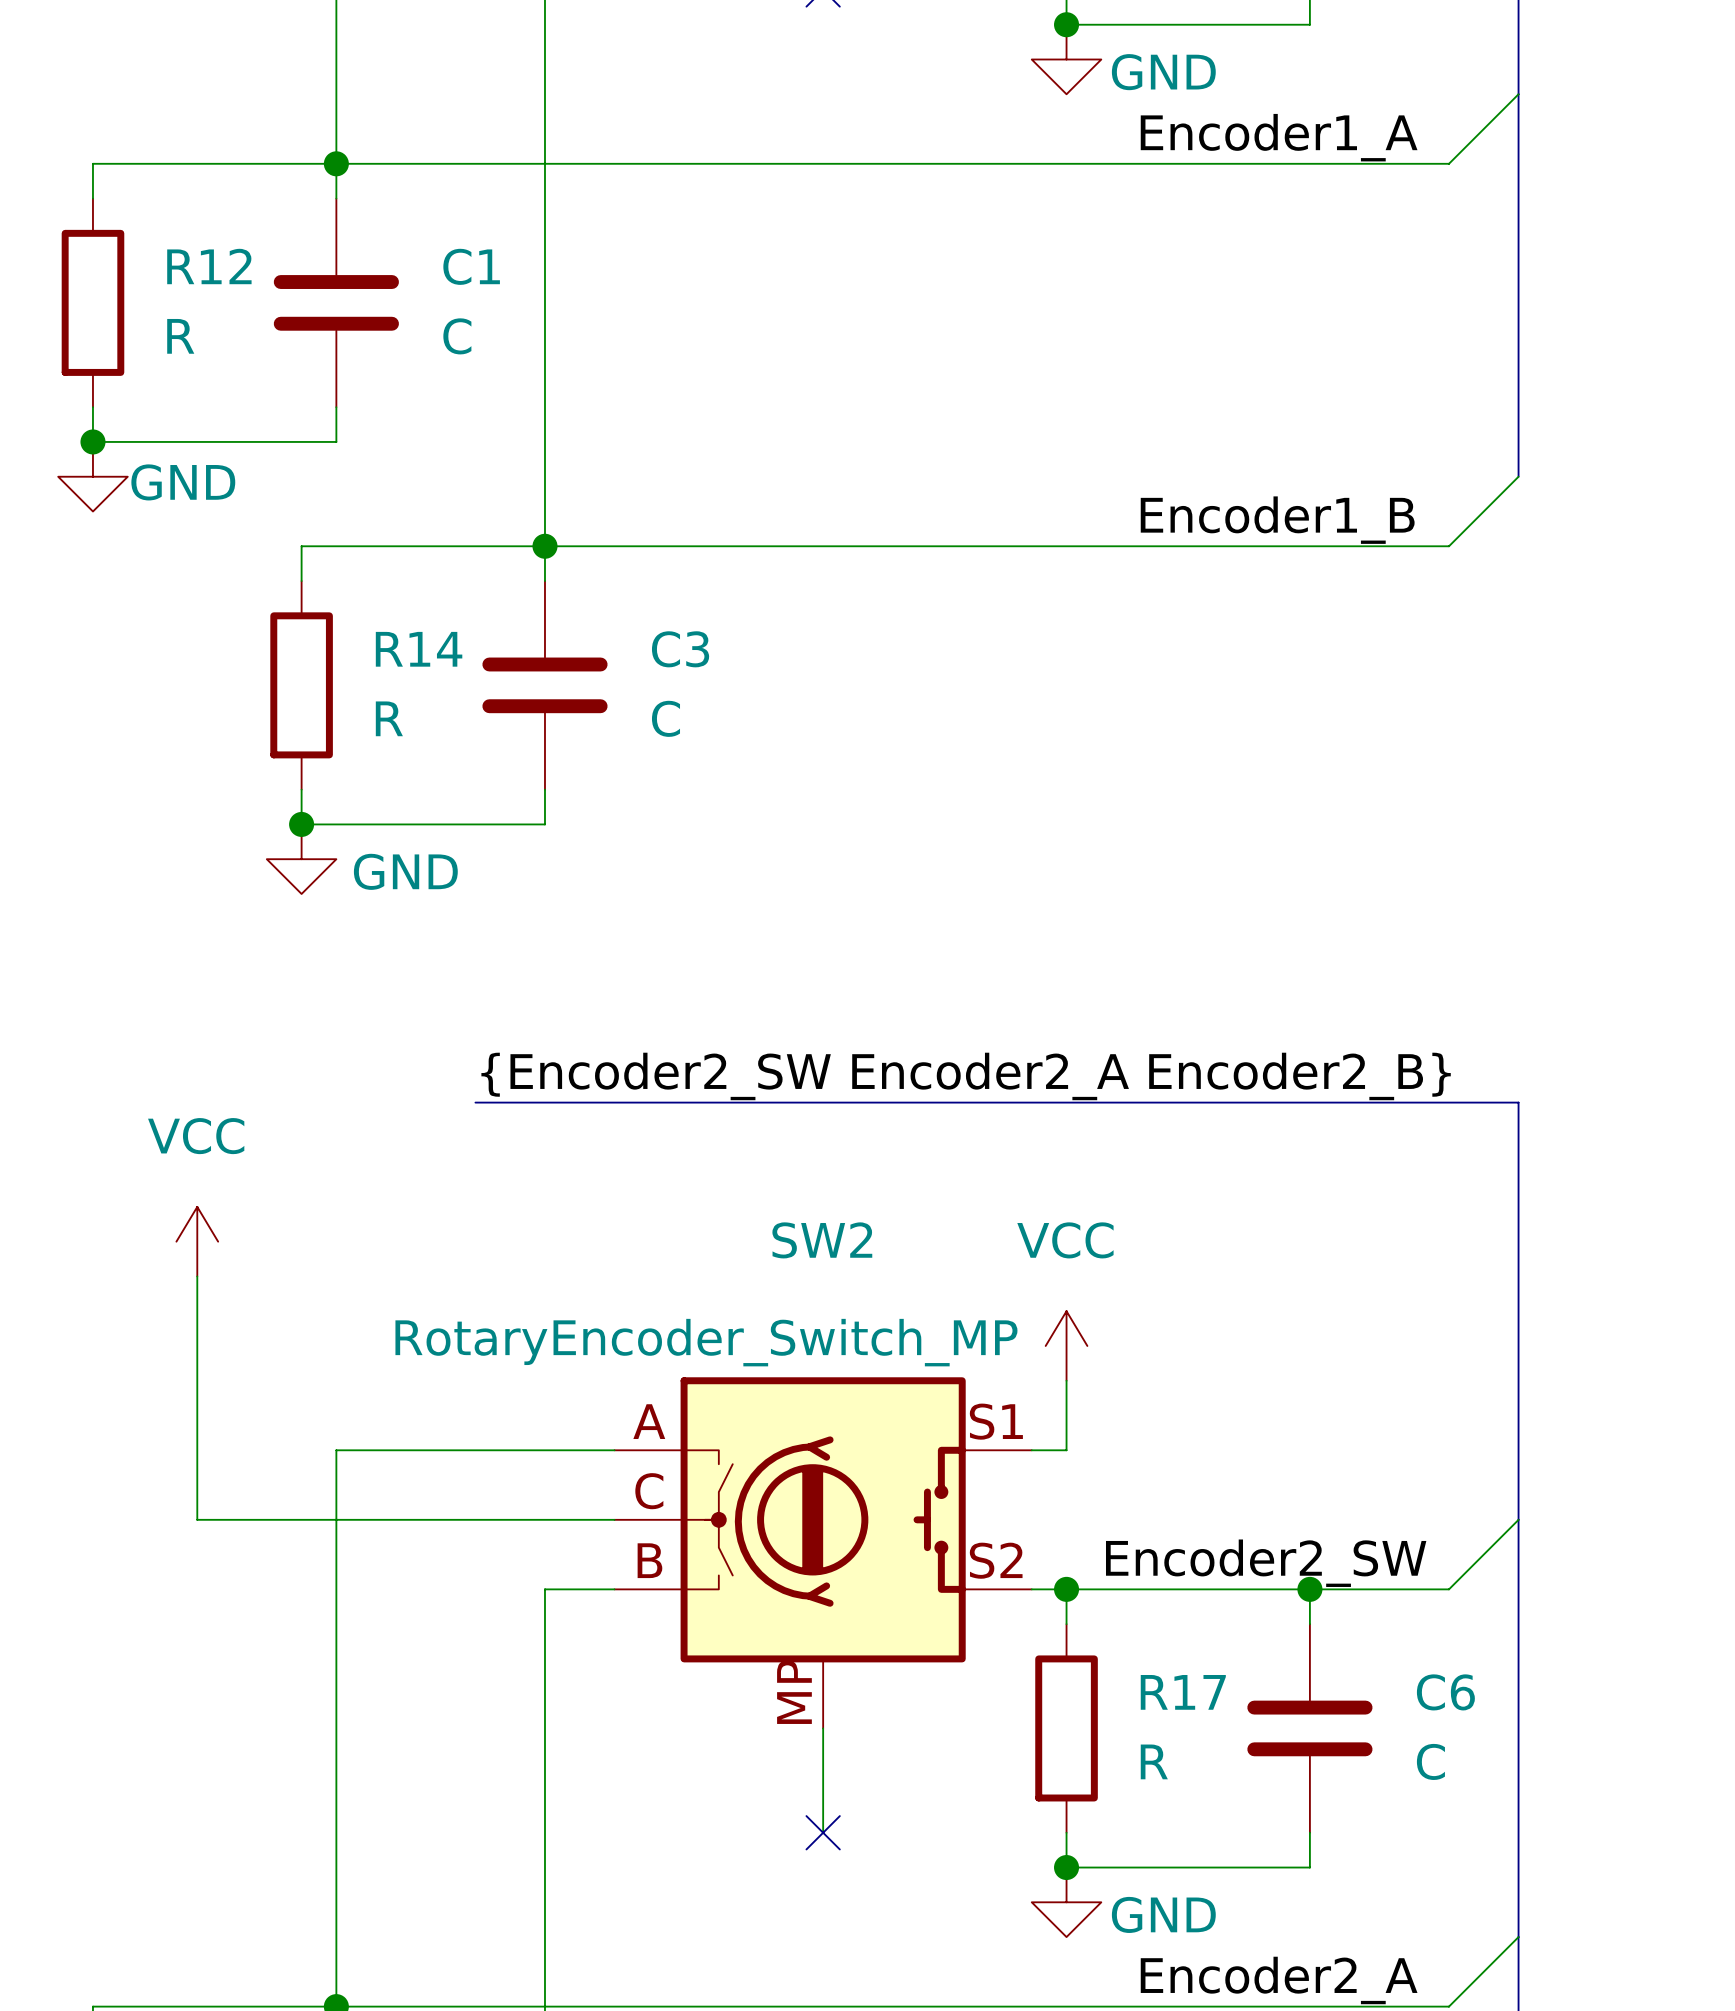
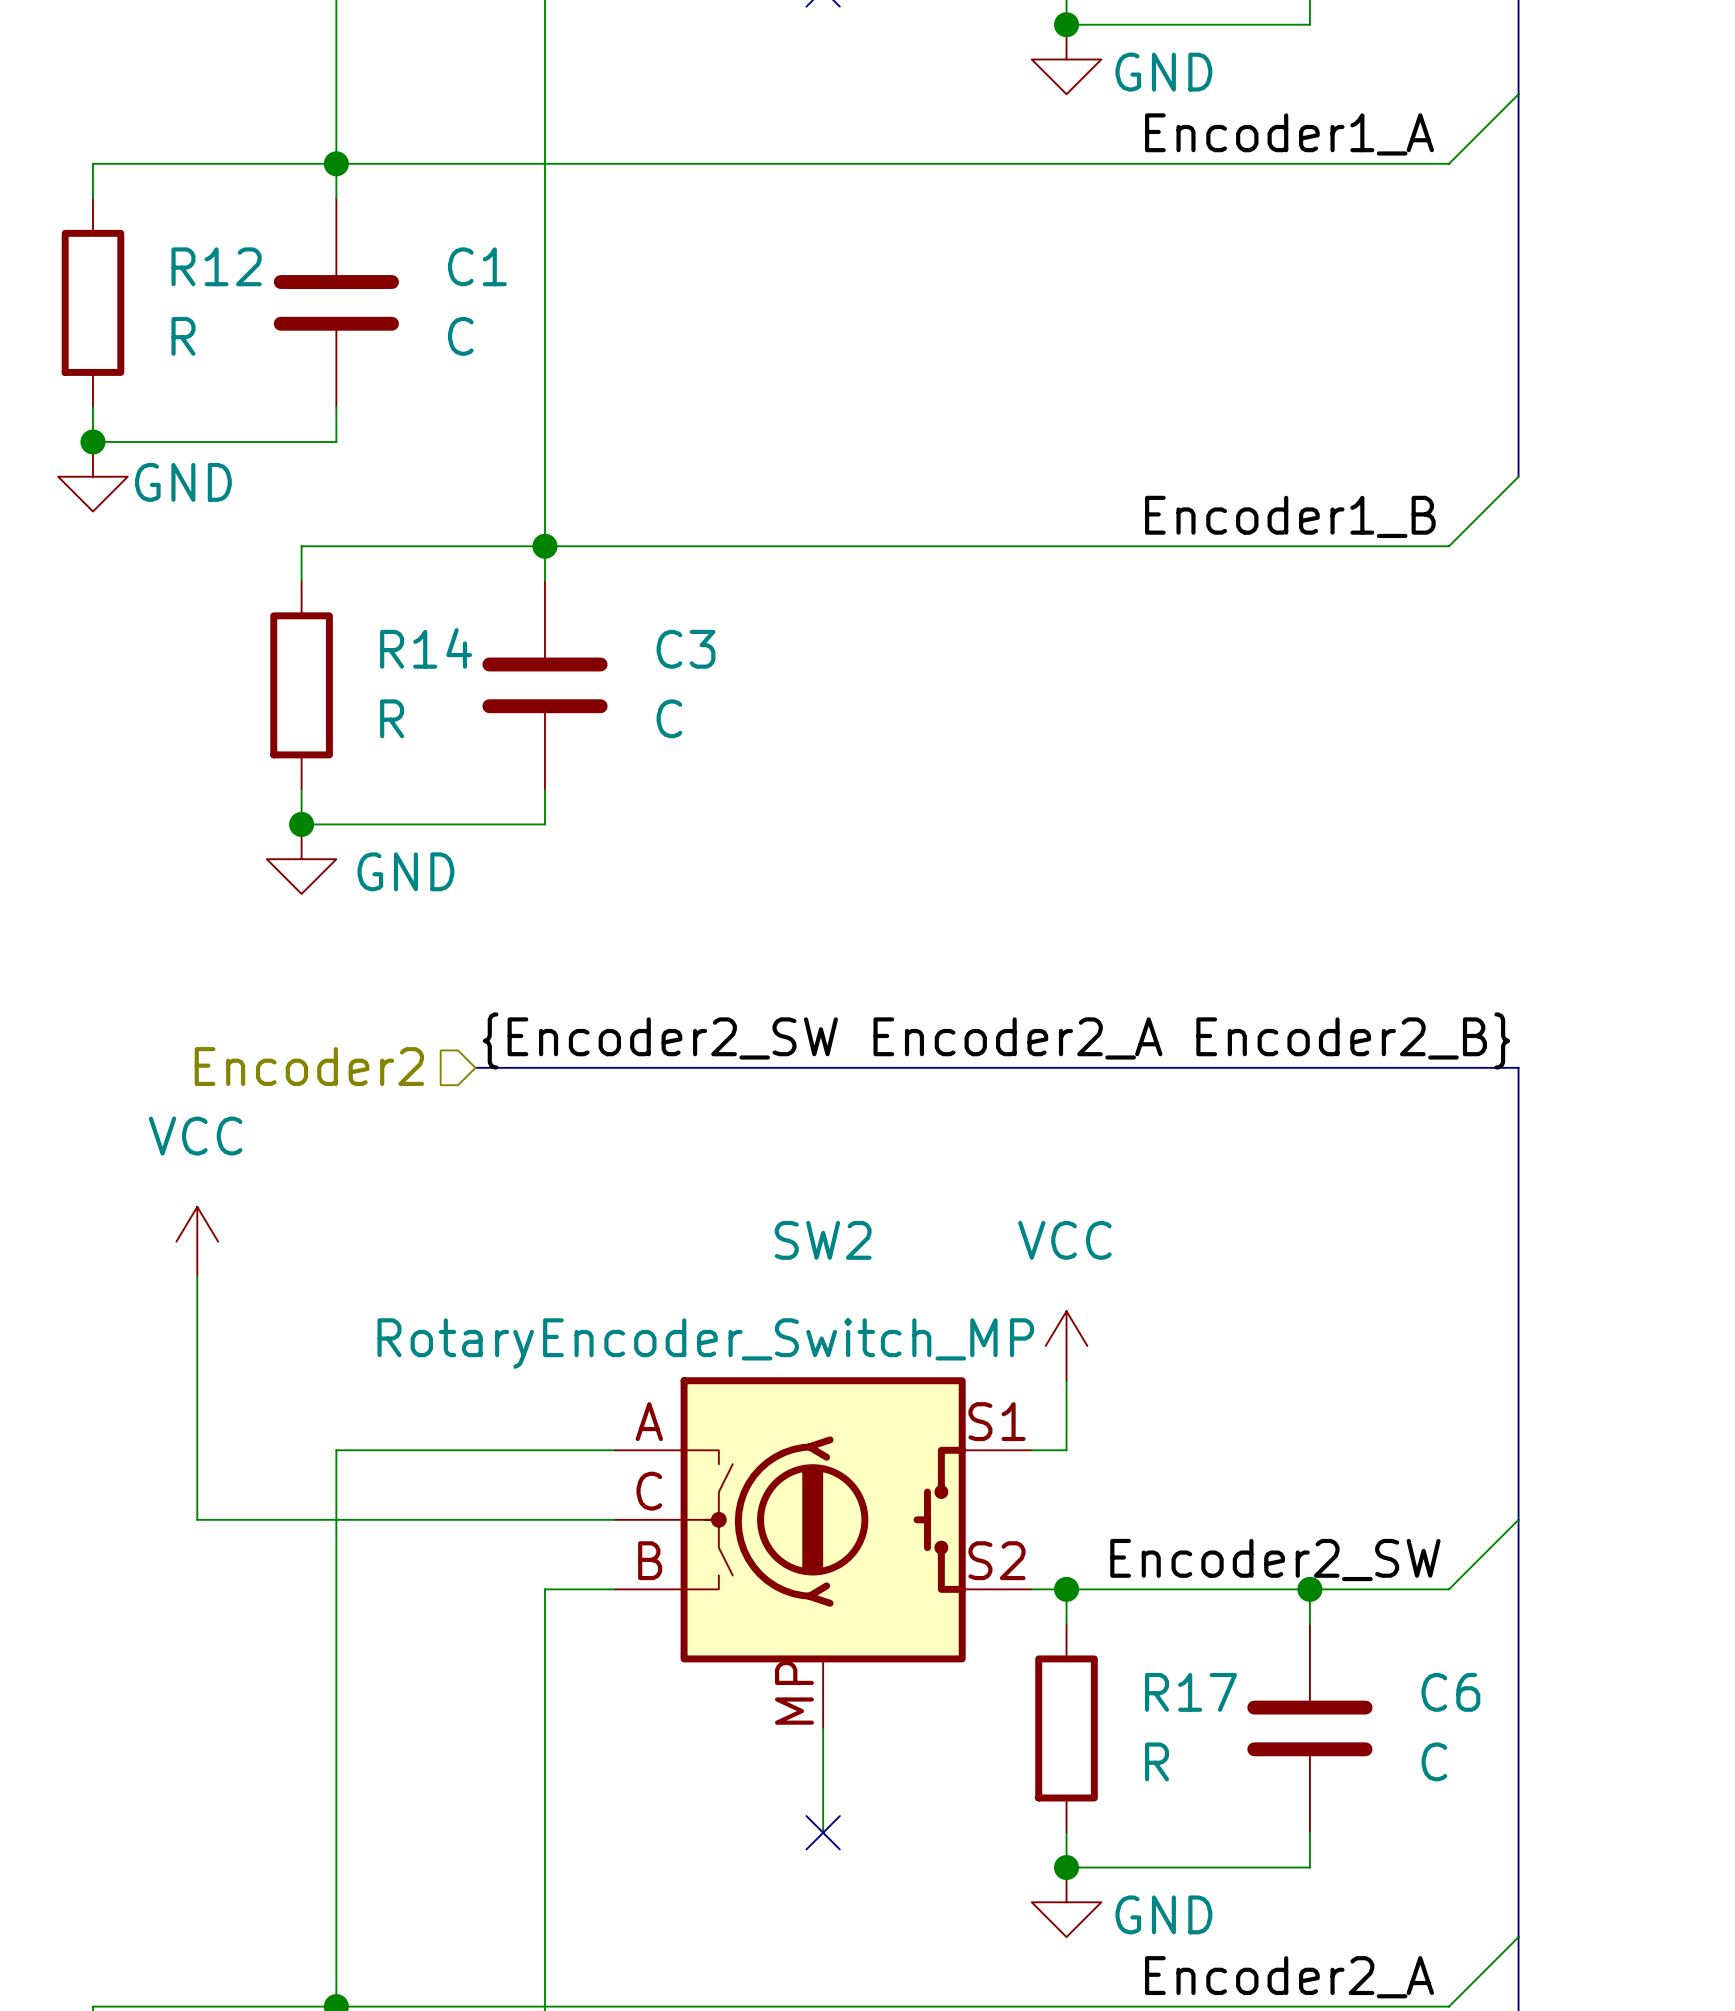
hierarchical label: none -> Encoder2 (309, 1066)
label position: {Encoder2_SW Encoder2_A Encoder2_B} (966, 1076) -> {Encoder2_SW Encoder2_A Encoder2_B} (996, 1040)
bus: (475, 1102) (1518, 1102) -> (475, 1067) (1518, 1067) (1518, 1102)

